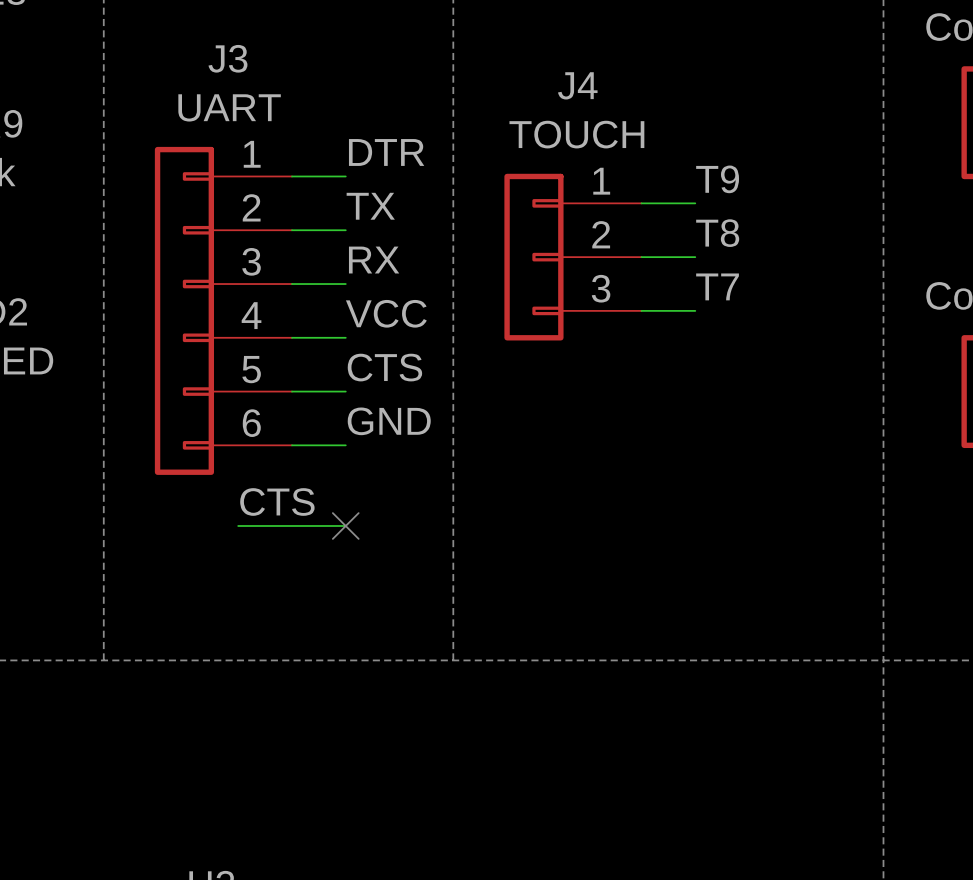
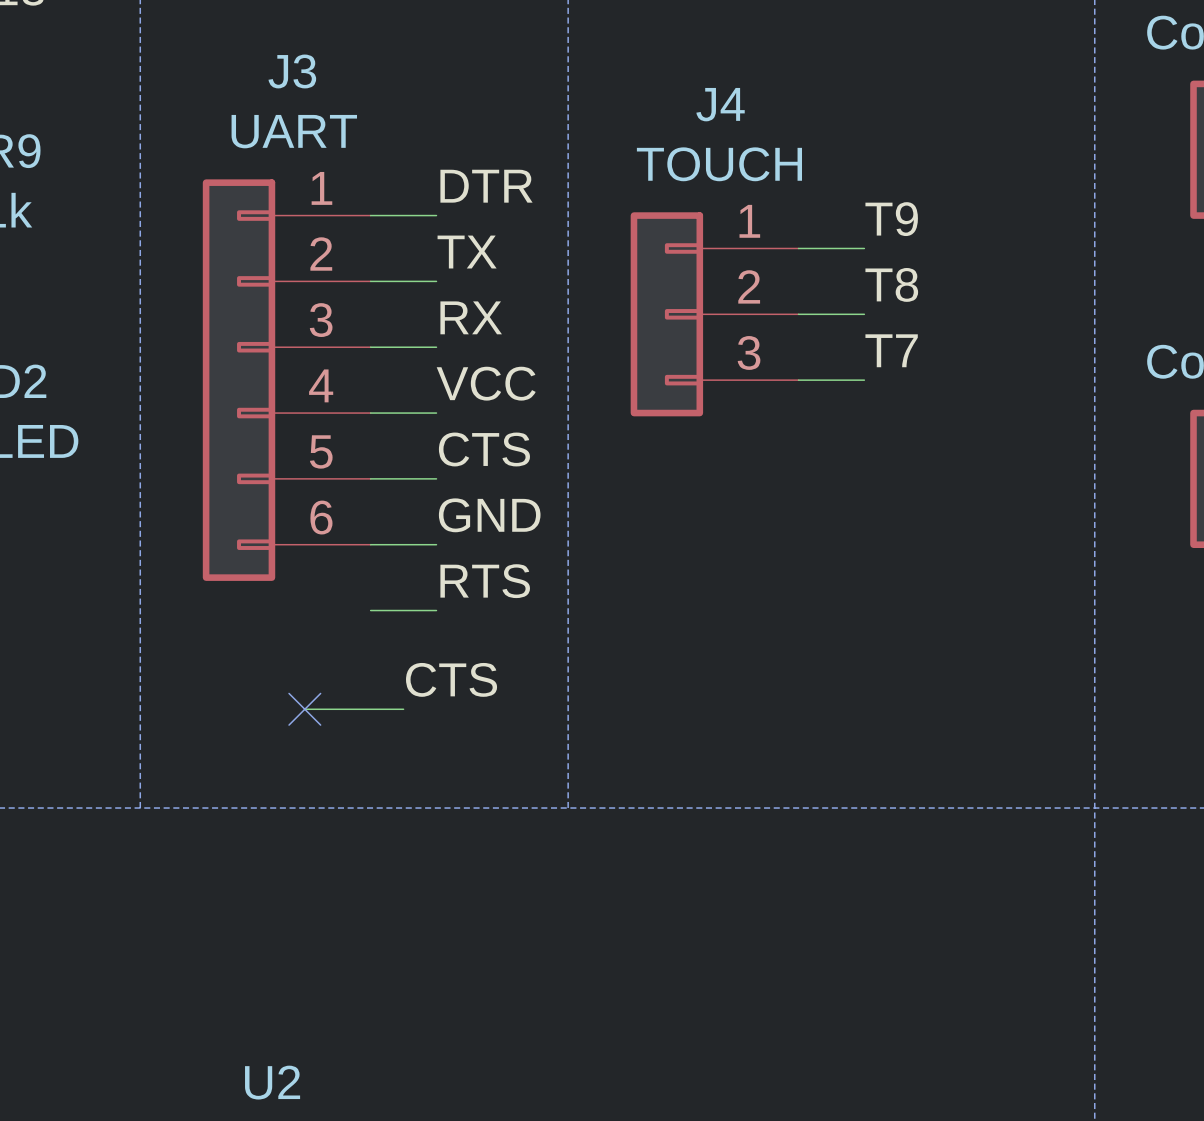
label: none -> RTS (485, 581)
wire: none -> (370, 610) (436, 610)
label position: CTS (277, 501) -> CTS (451, 679)
wire: (238, 525) (345, 525) -> none
no-connect mark position: (345, 525) -> (304, 709)
wire: none -> (304, 709) (403, 709)

